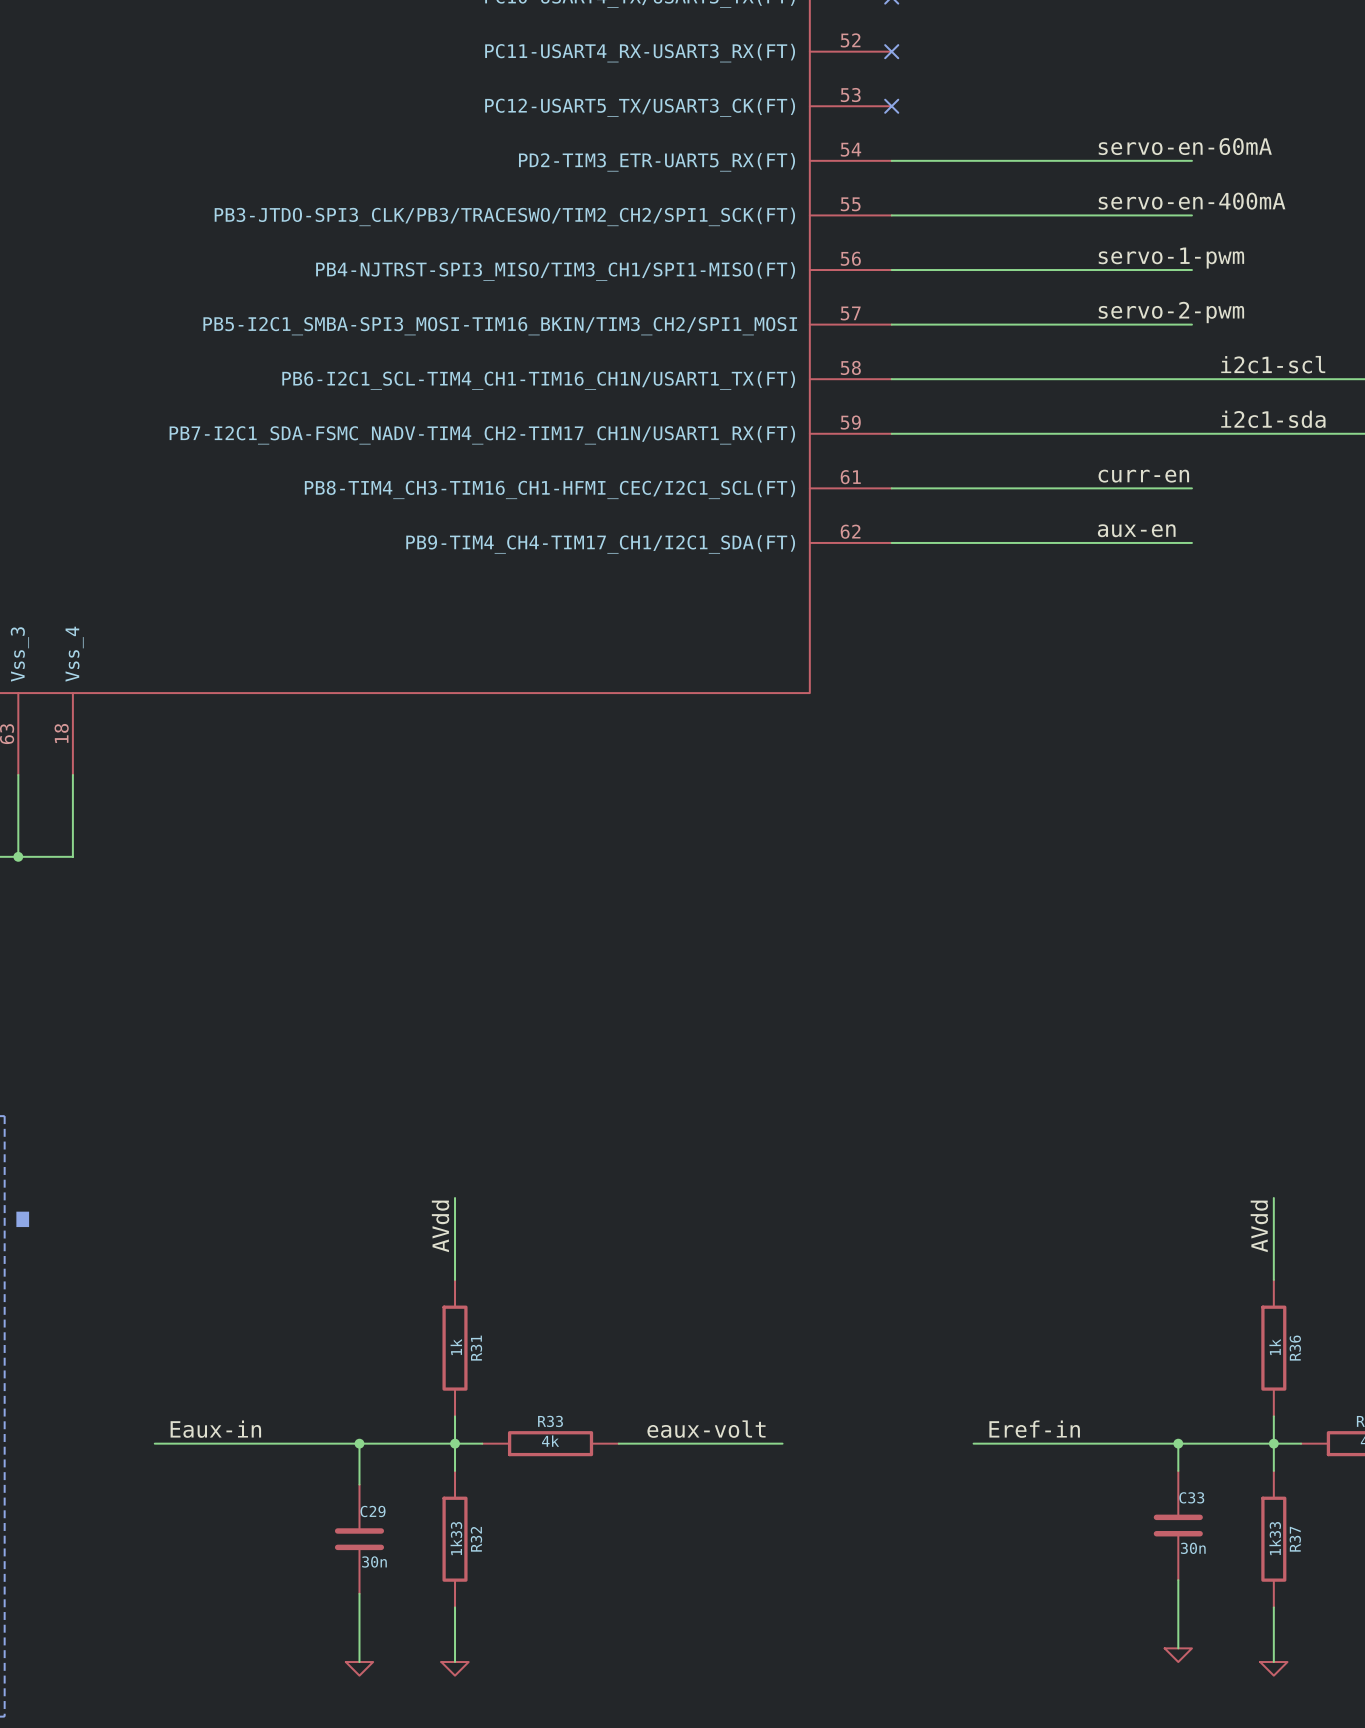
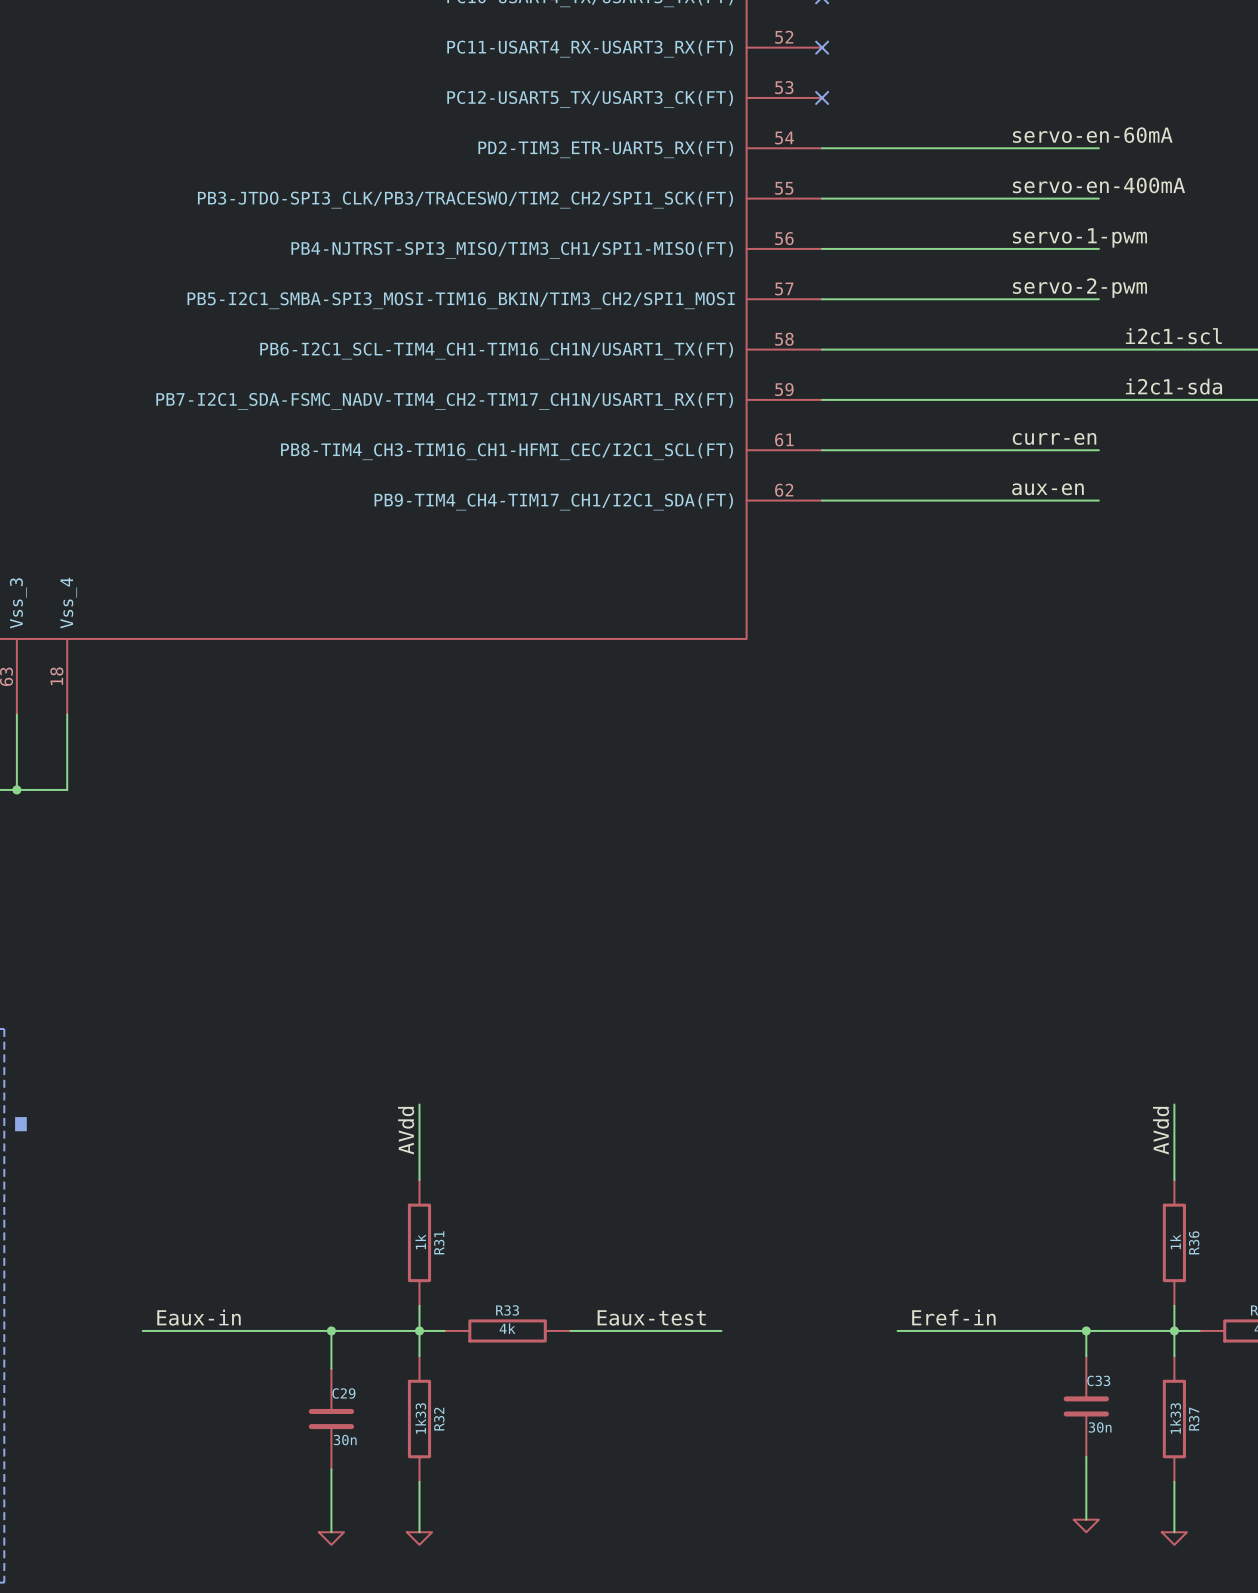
label: eaux-volt (706, 1429) -> Eaux-test (651, 1317)

